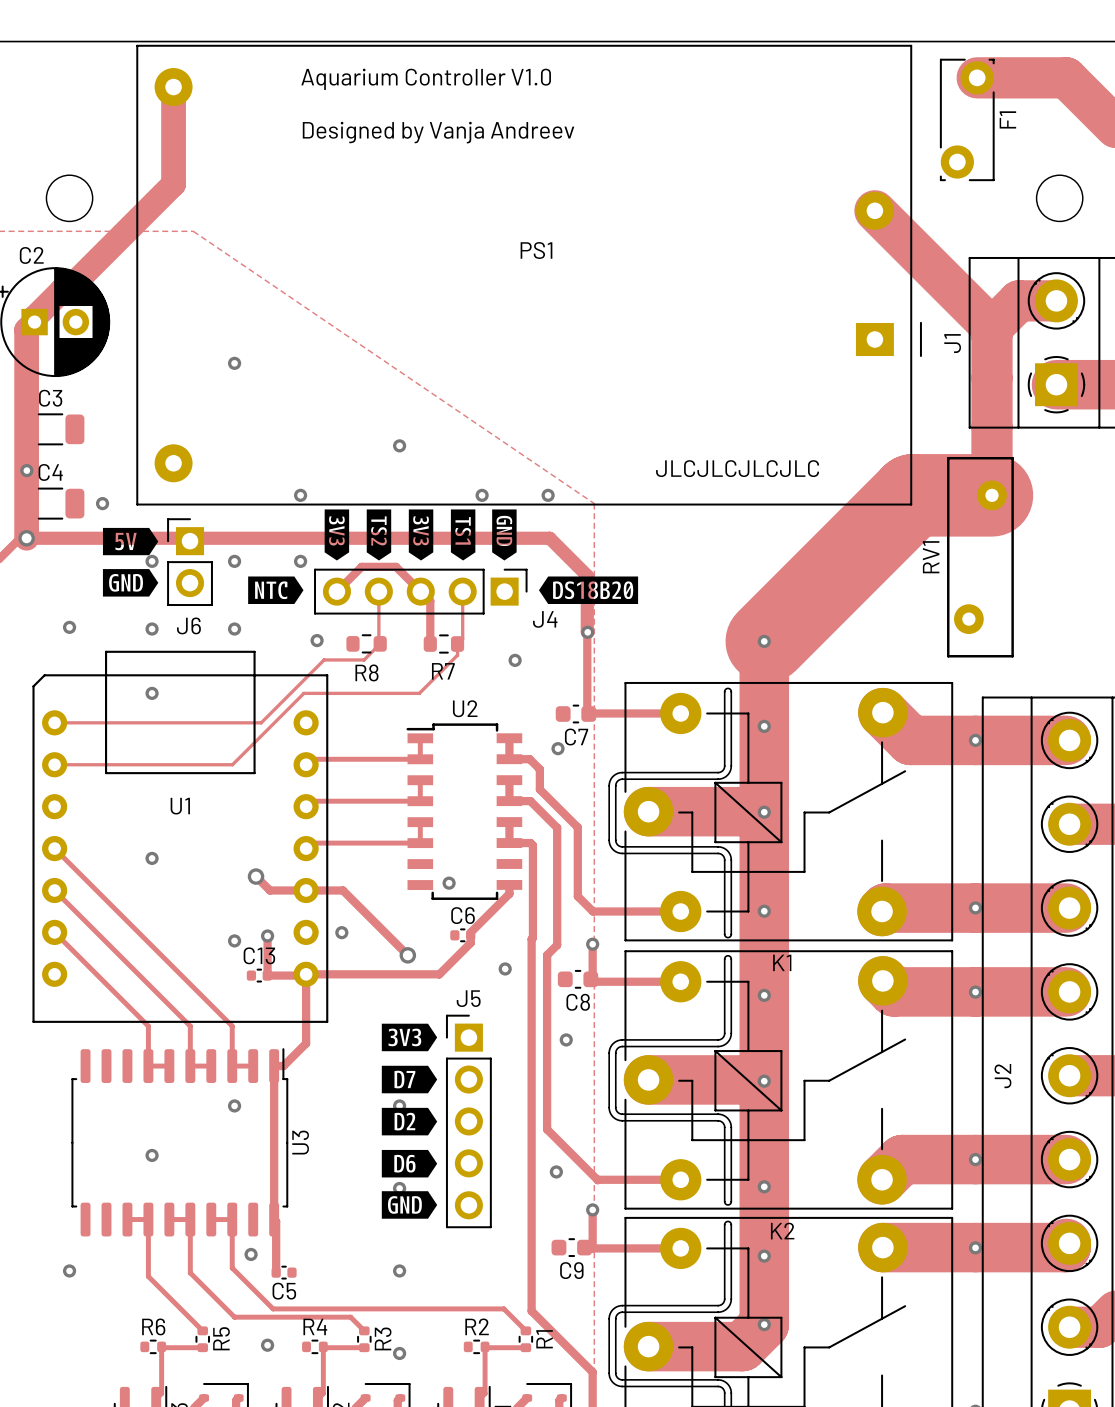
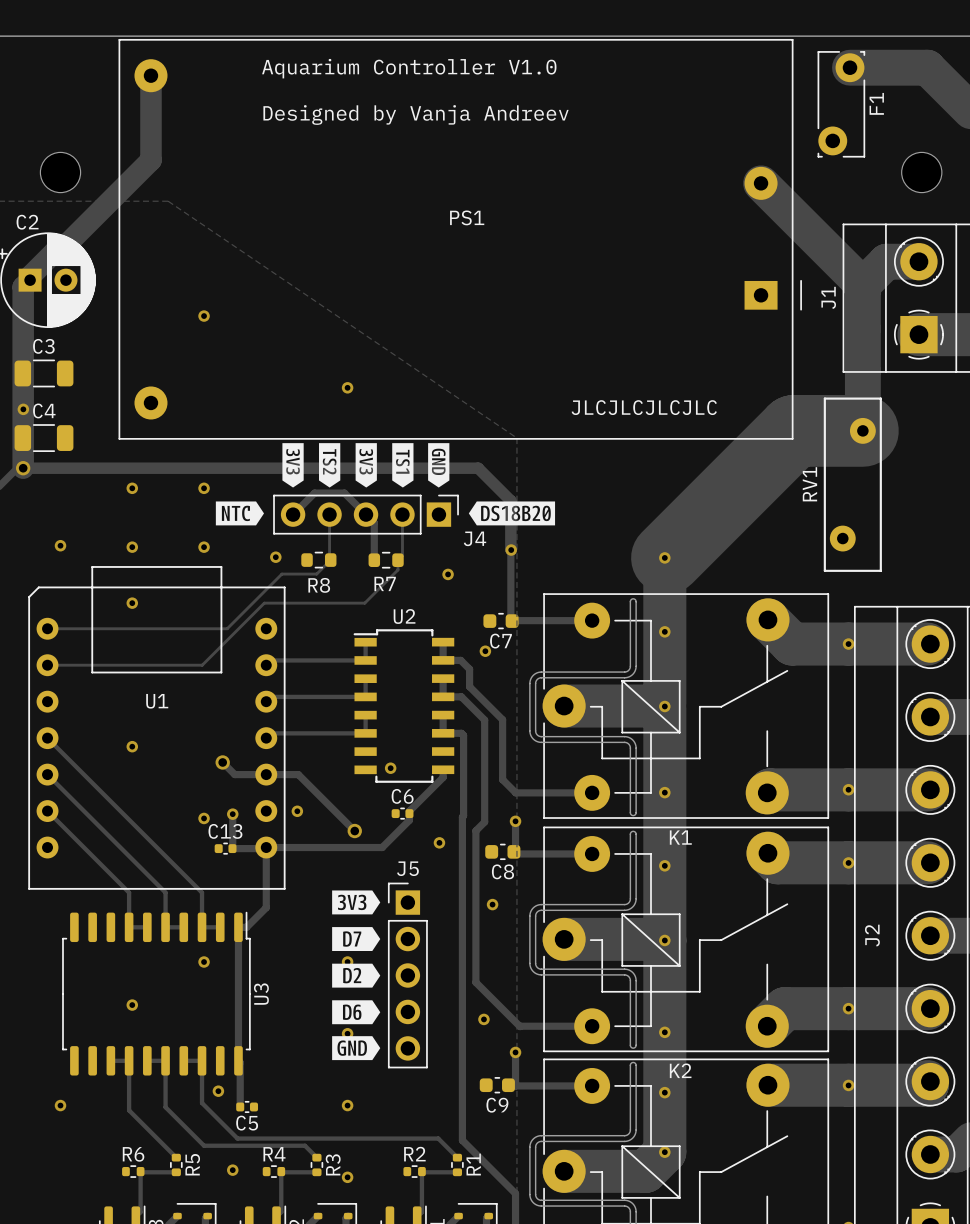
via: (300, 495) -> none
via: (482, 495) -> none
via: (548, 495) -> none
via: (102, 503) -> none
drawing: [102, 527, 159, 597] -> none
via: (300, 561) -> none
J6: (190, 562) -> none

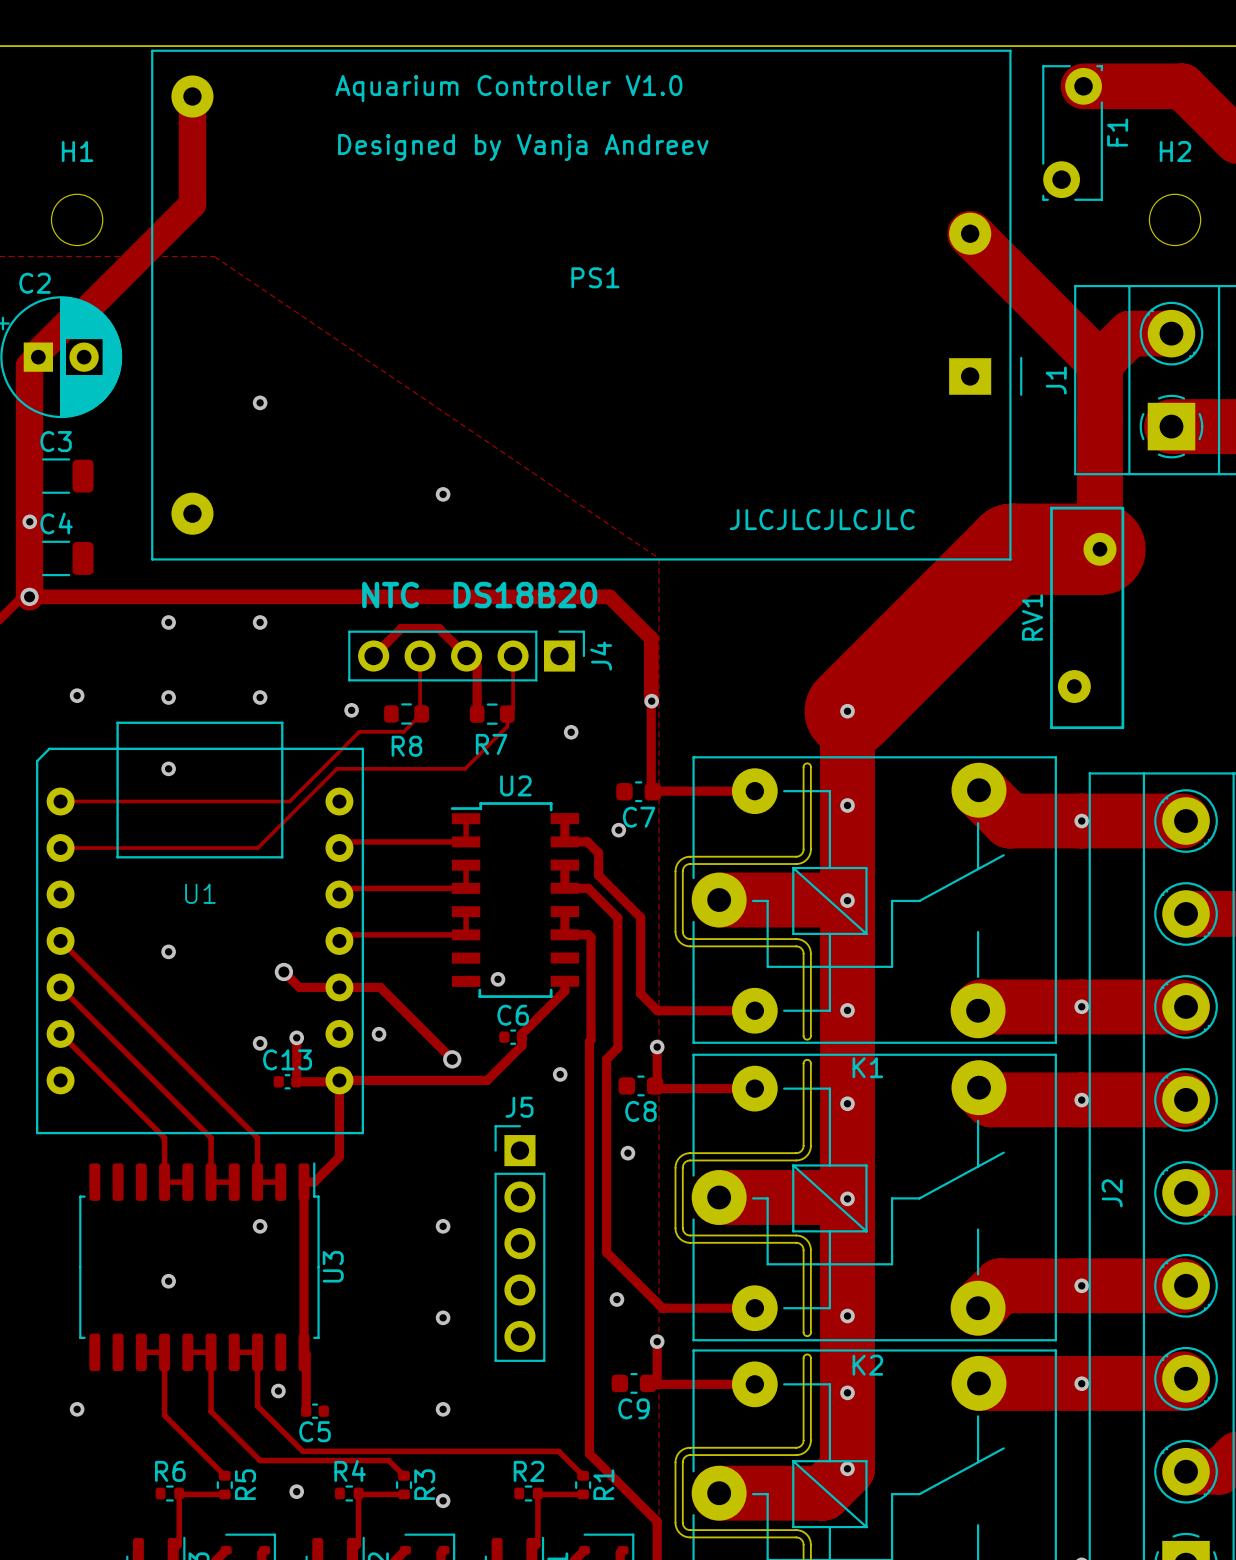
H1 name: none -> H1 (77, 151)
H2 name: none -> H2 (1175, 151)
drawing: [282, 443, 450, 488] -> none
text: none -> NTC (390, 595)
text: none -> DS18B20 (525, 595)
drawing: [215, 501, 265, 526] -> none
drawing: [468, 501, 556, 526] -> none
J4 name rotation: 0° (474, 538) -> 90° counterclockwise (601, 656)
drawing: [332, 890, 381, 1061] -> none

